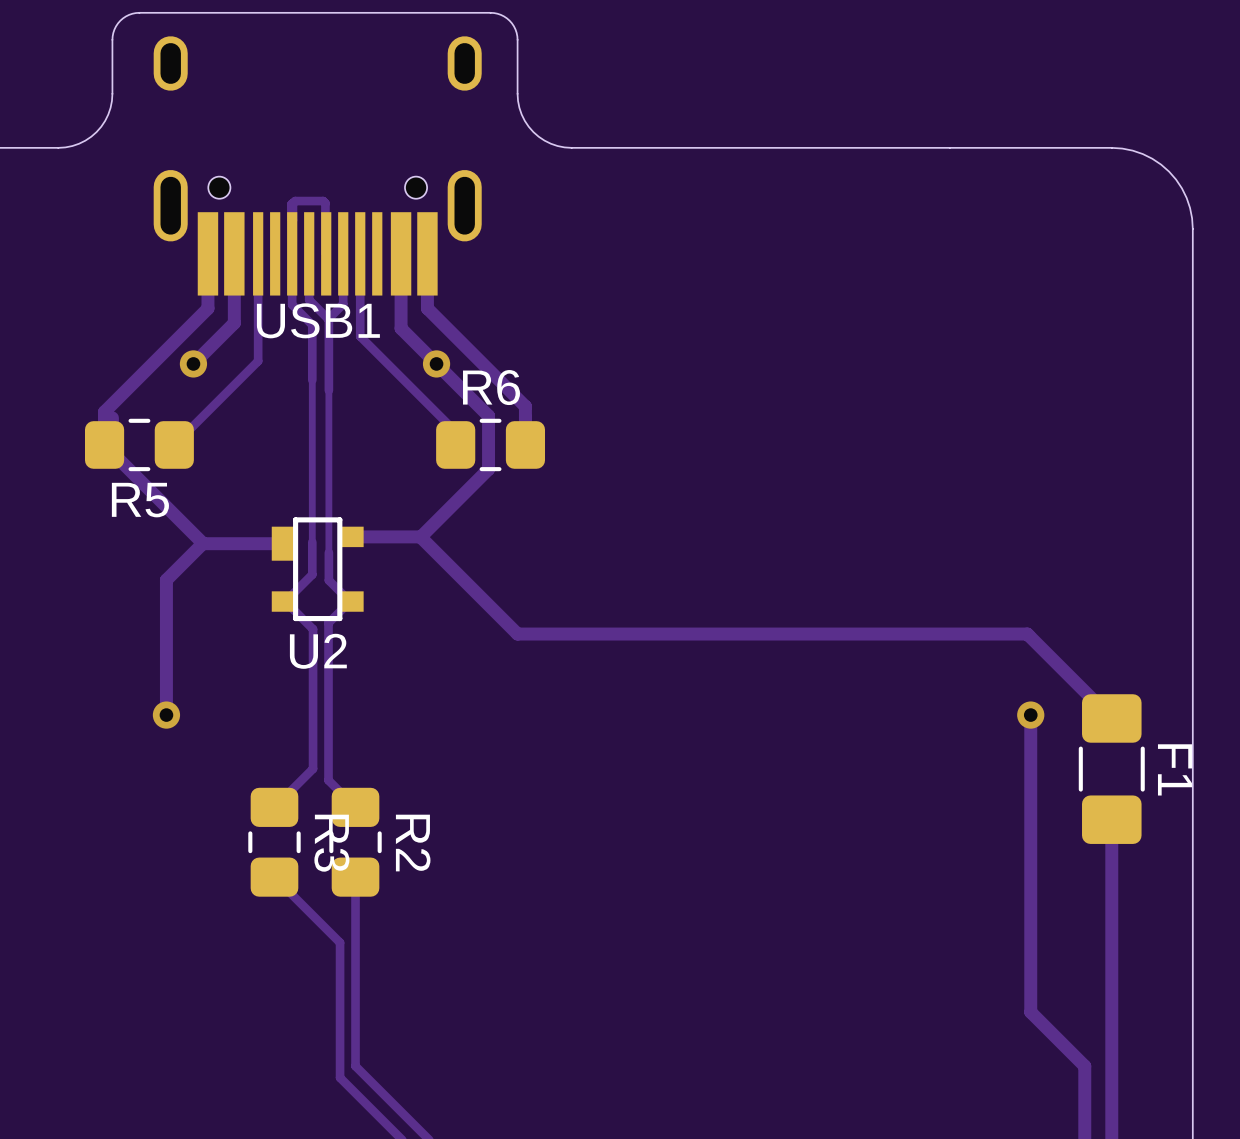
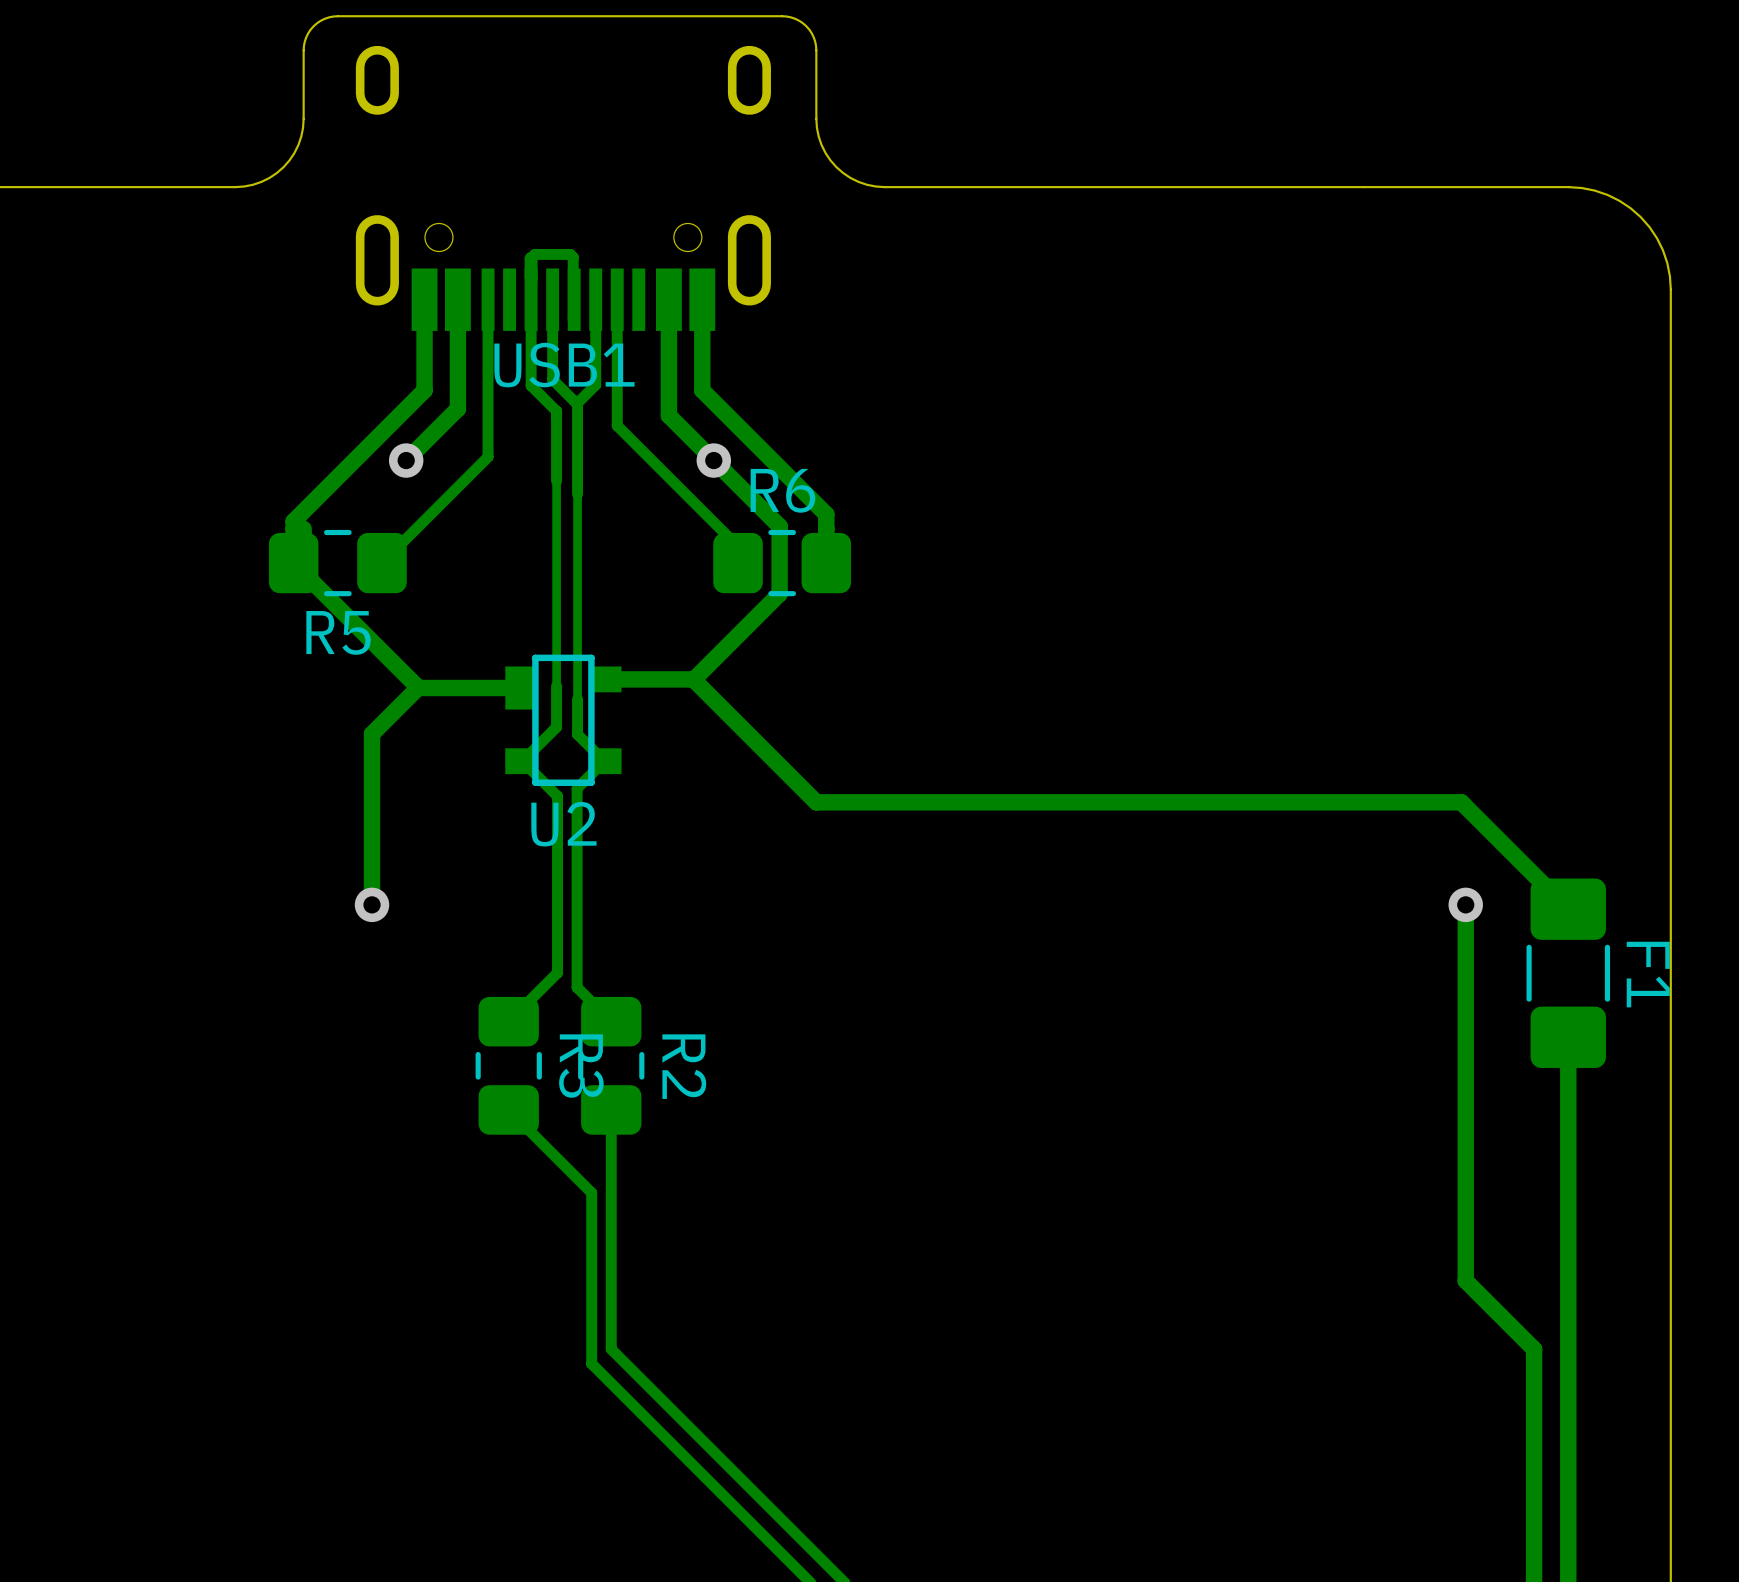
USB1 footprint: [153, 36, 482, 296] -> [355, 45, 771, 331]
USB1 name position: USB1 (318, 320) -> USB1 (564, 365)

